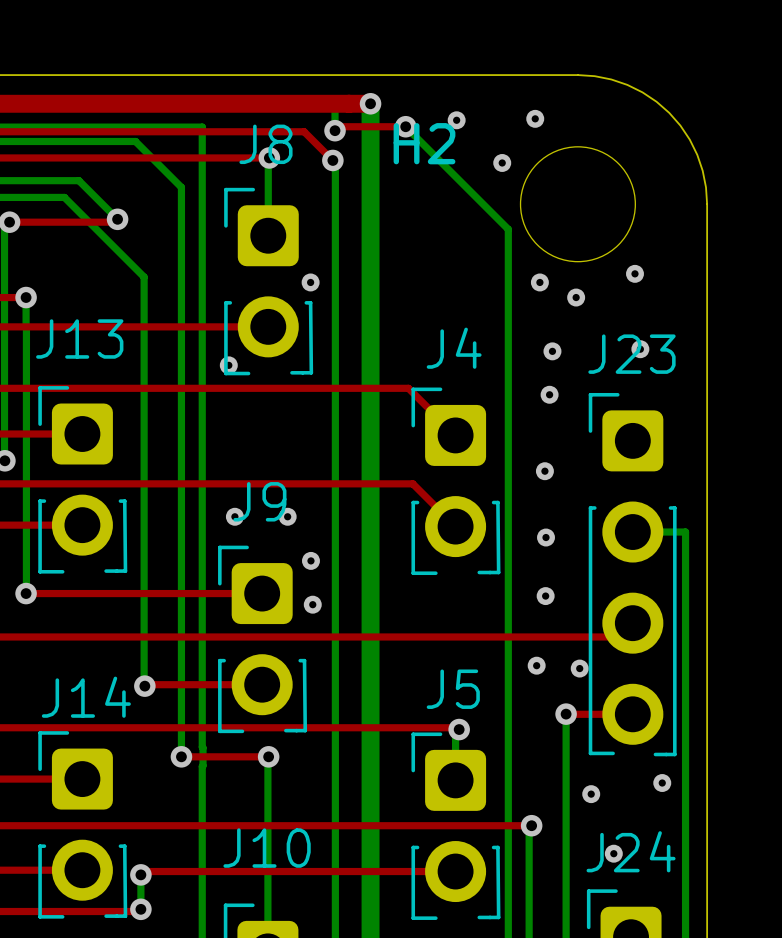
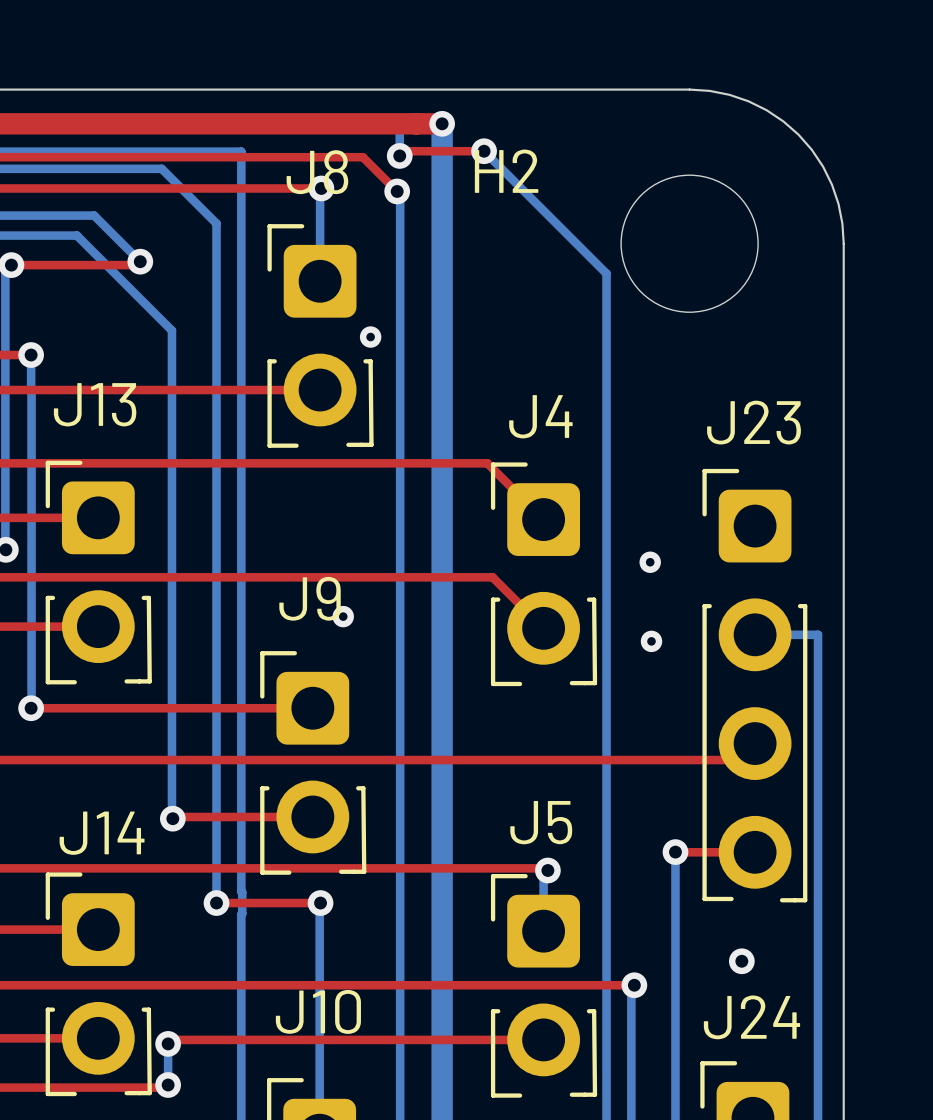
via: (535, 118) -> none
via: (456, 120) -> none
via: (502, 162) -> none
via: (634, 273) -> none
via: (539, 282) -> none
via: (576, 297) -> none
via: (640, 349) -> none
via: (552, 351) -> none
via: (228, 365) -> none
via: (549, 394) -> none
via: (234, 516) -> none
via: (310, 560) -> none
via: (545, 596) -> none
via: (312, 604) -> none
via: (536, 665) -> none
via: (579, 668) -> none
via: (662, 783) -> none
via: (591, 794) -> none
via: none -> (741, 961)
via: (613, 853) -> none

